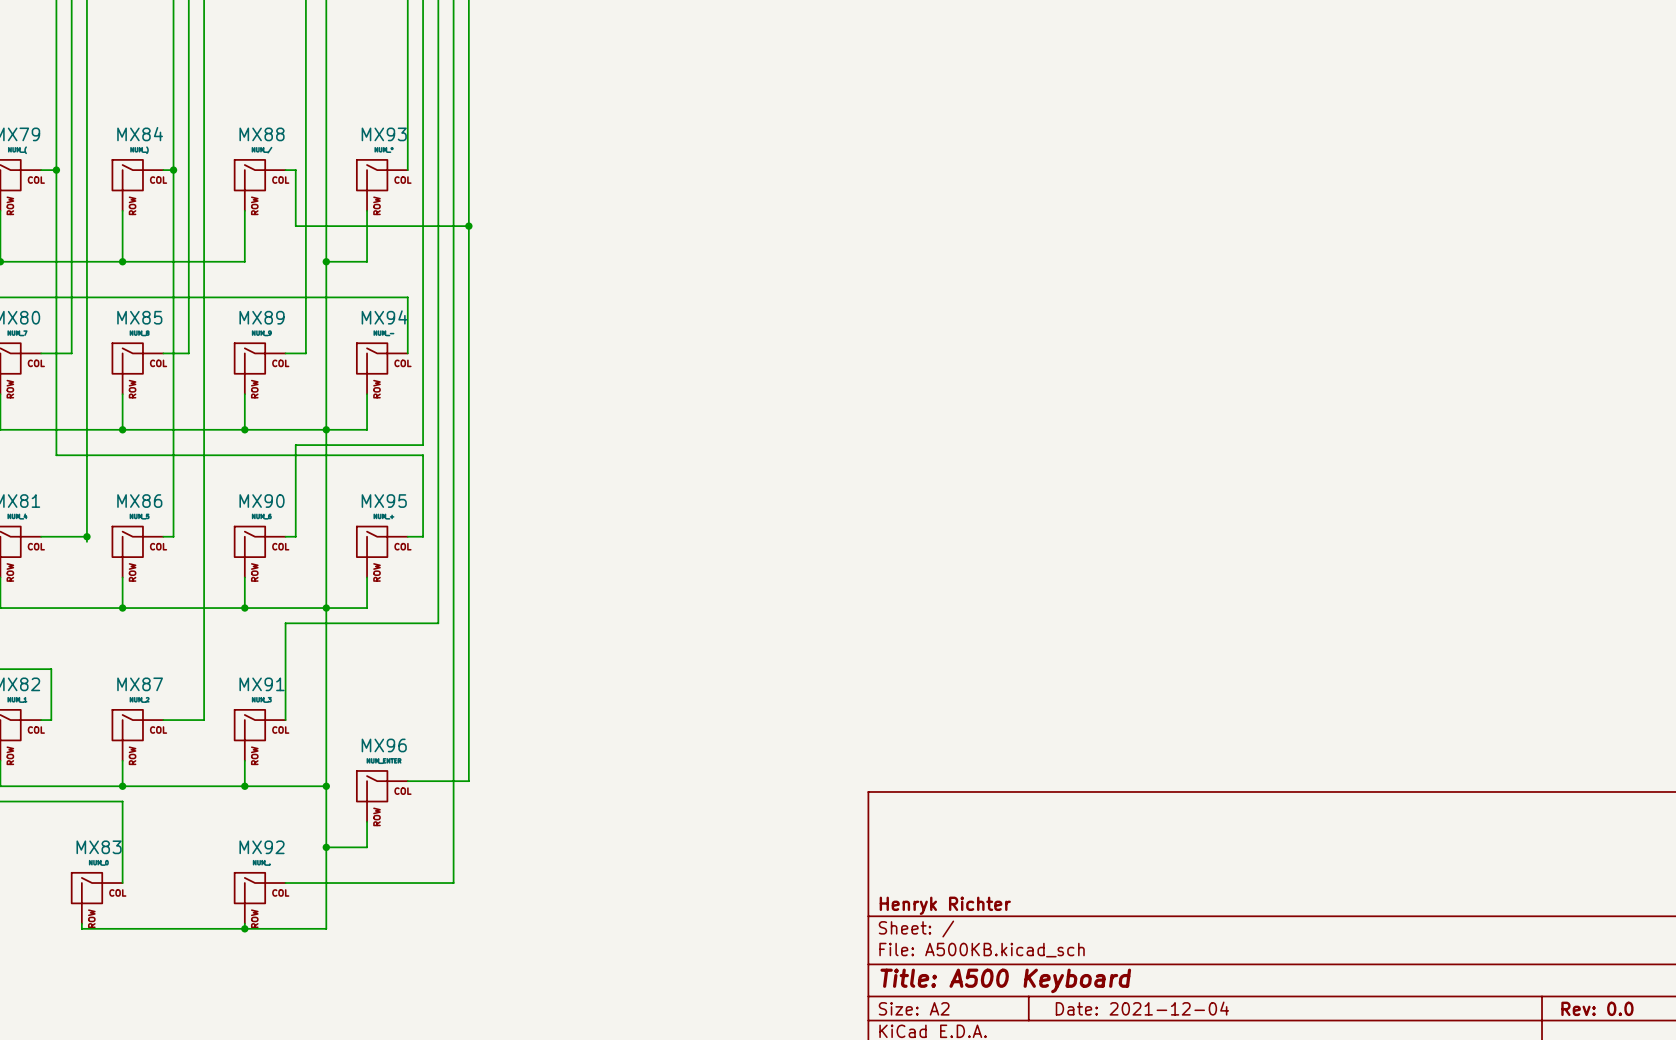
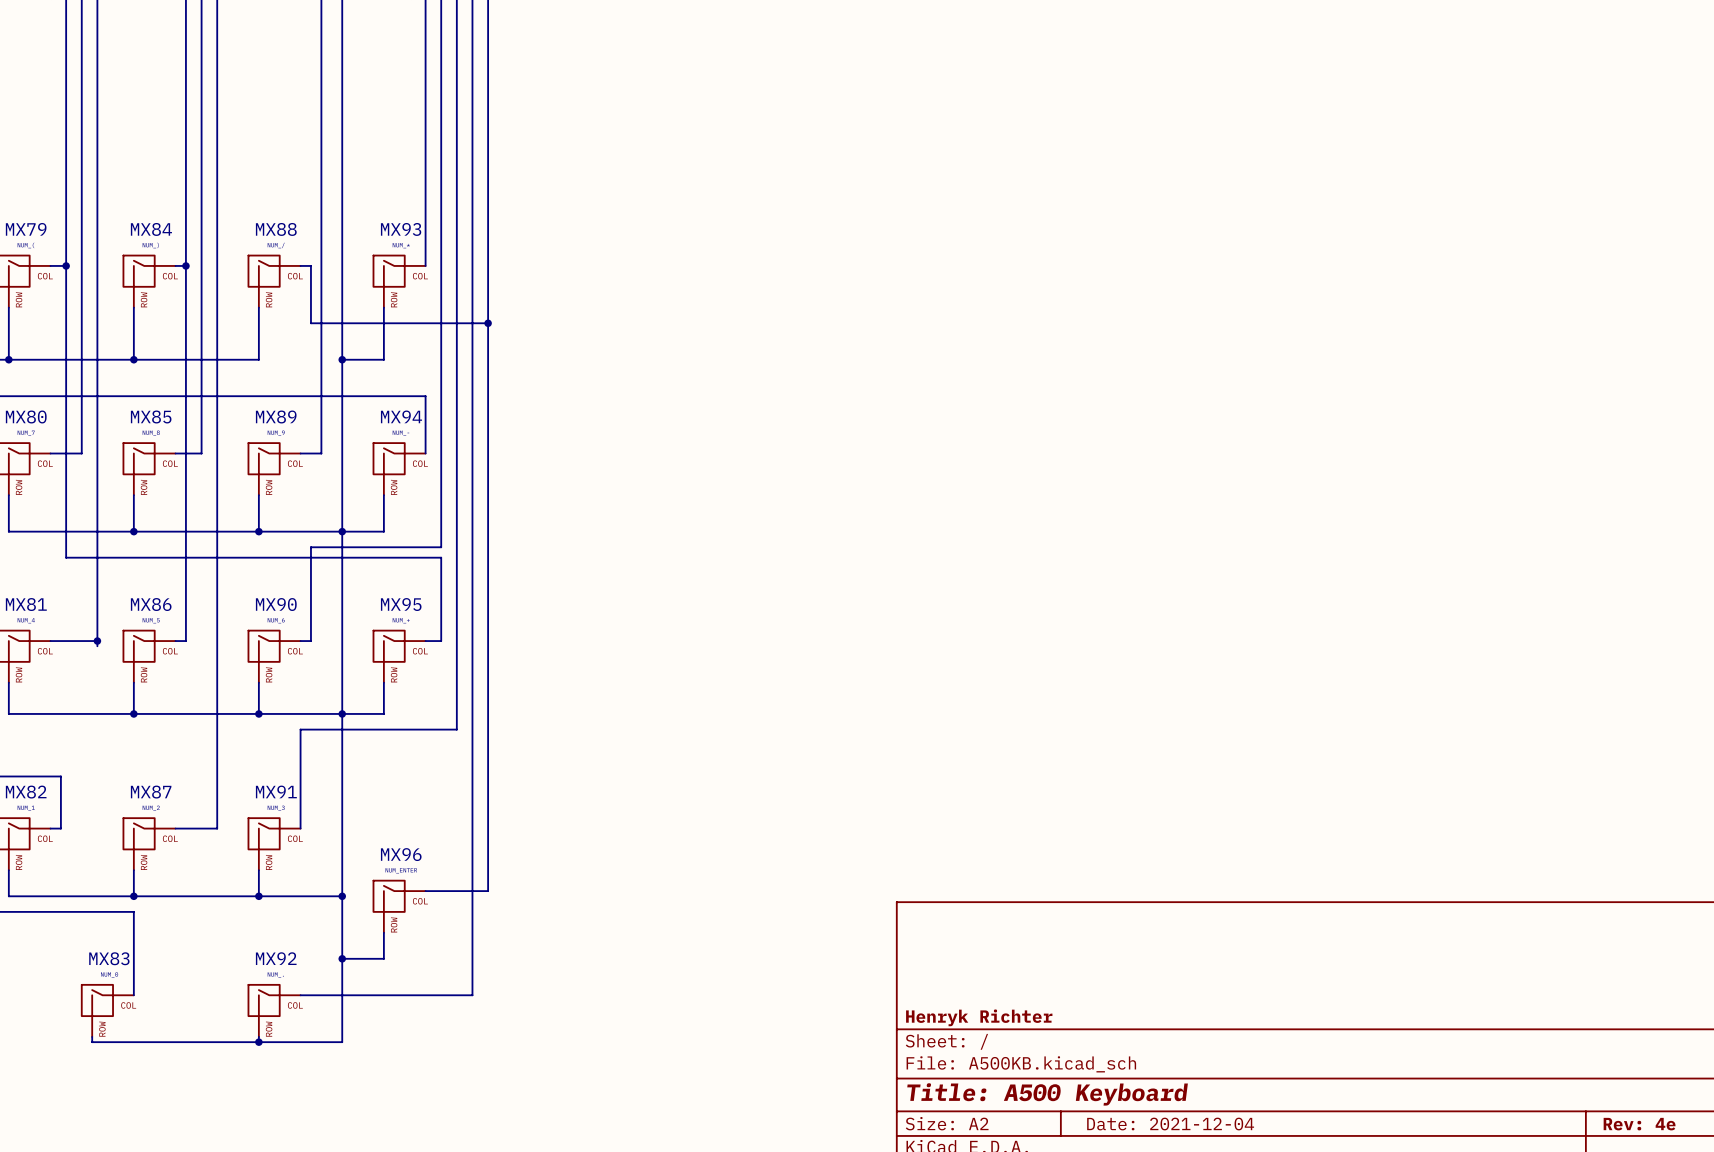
title block: Rev: 0.0 (1597, 1008) -> Rev: 4e (1639, 1124)

